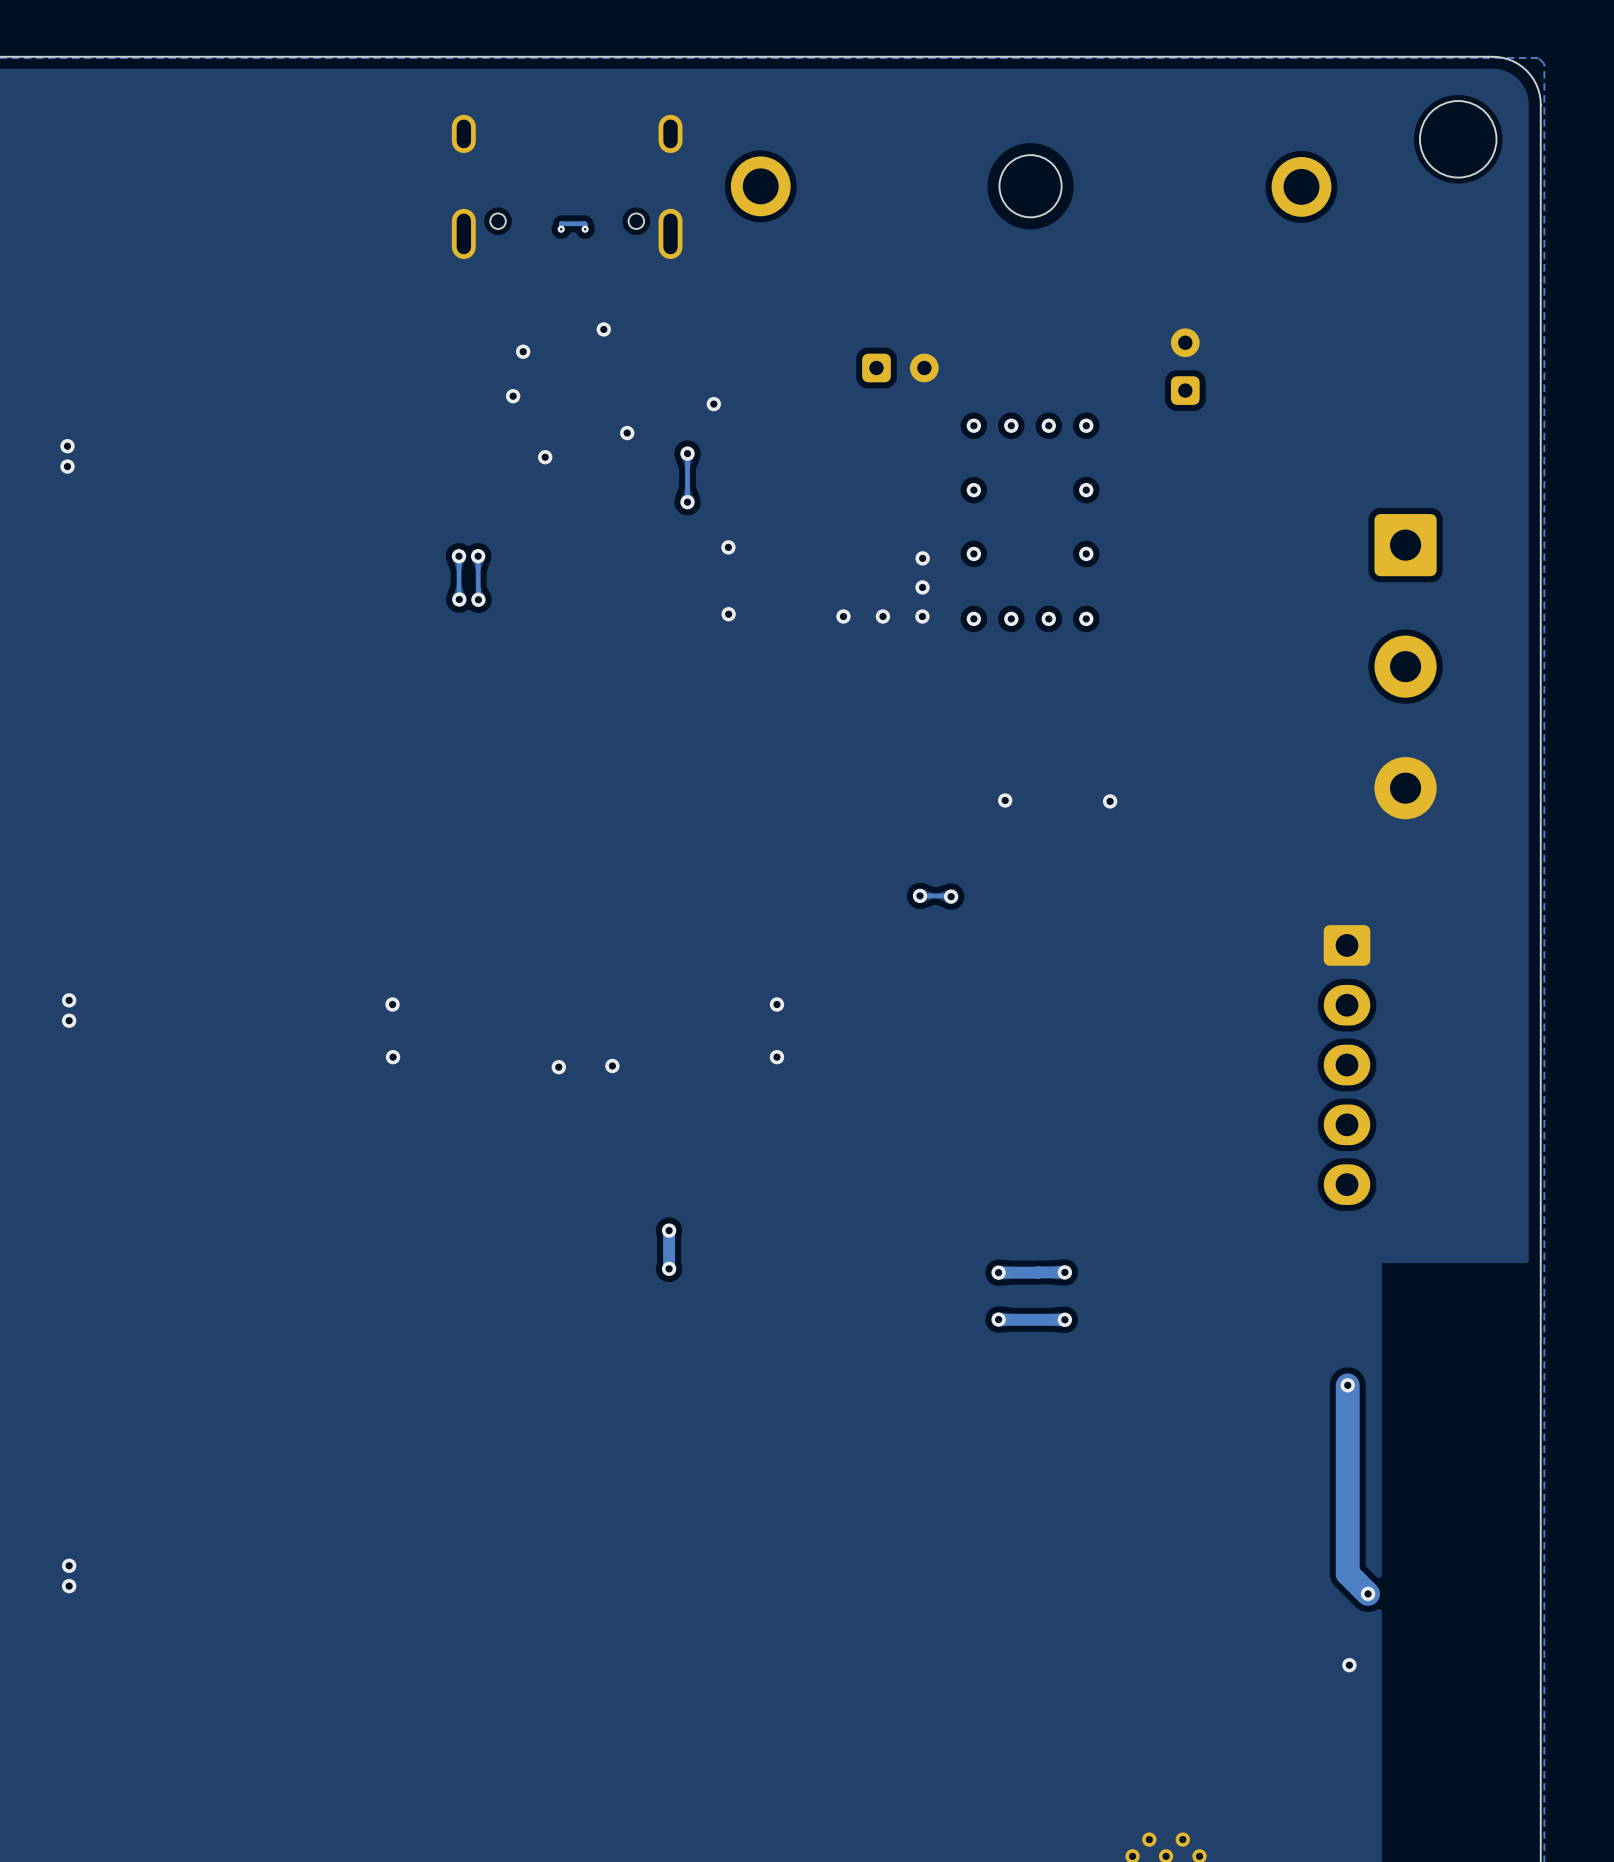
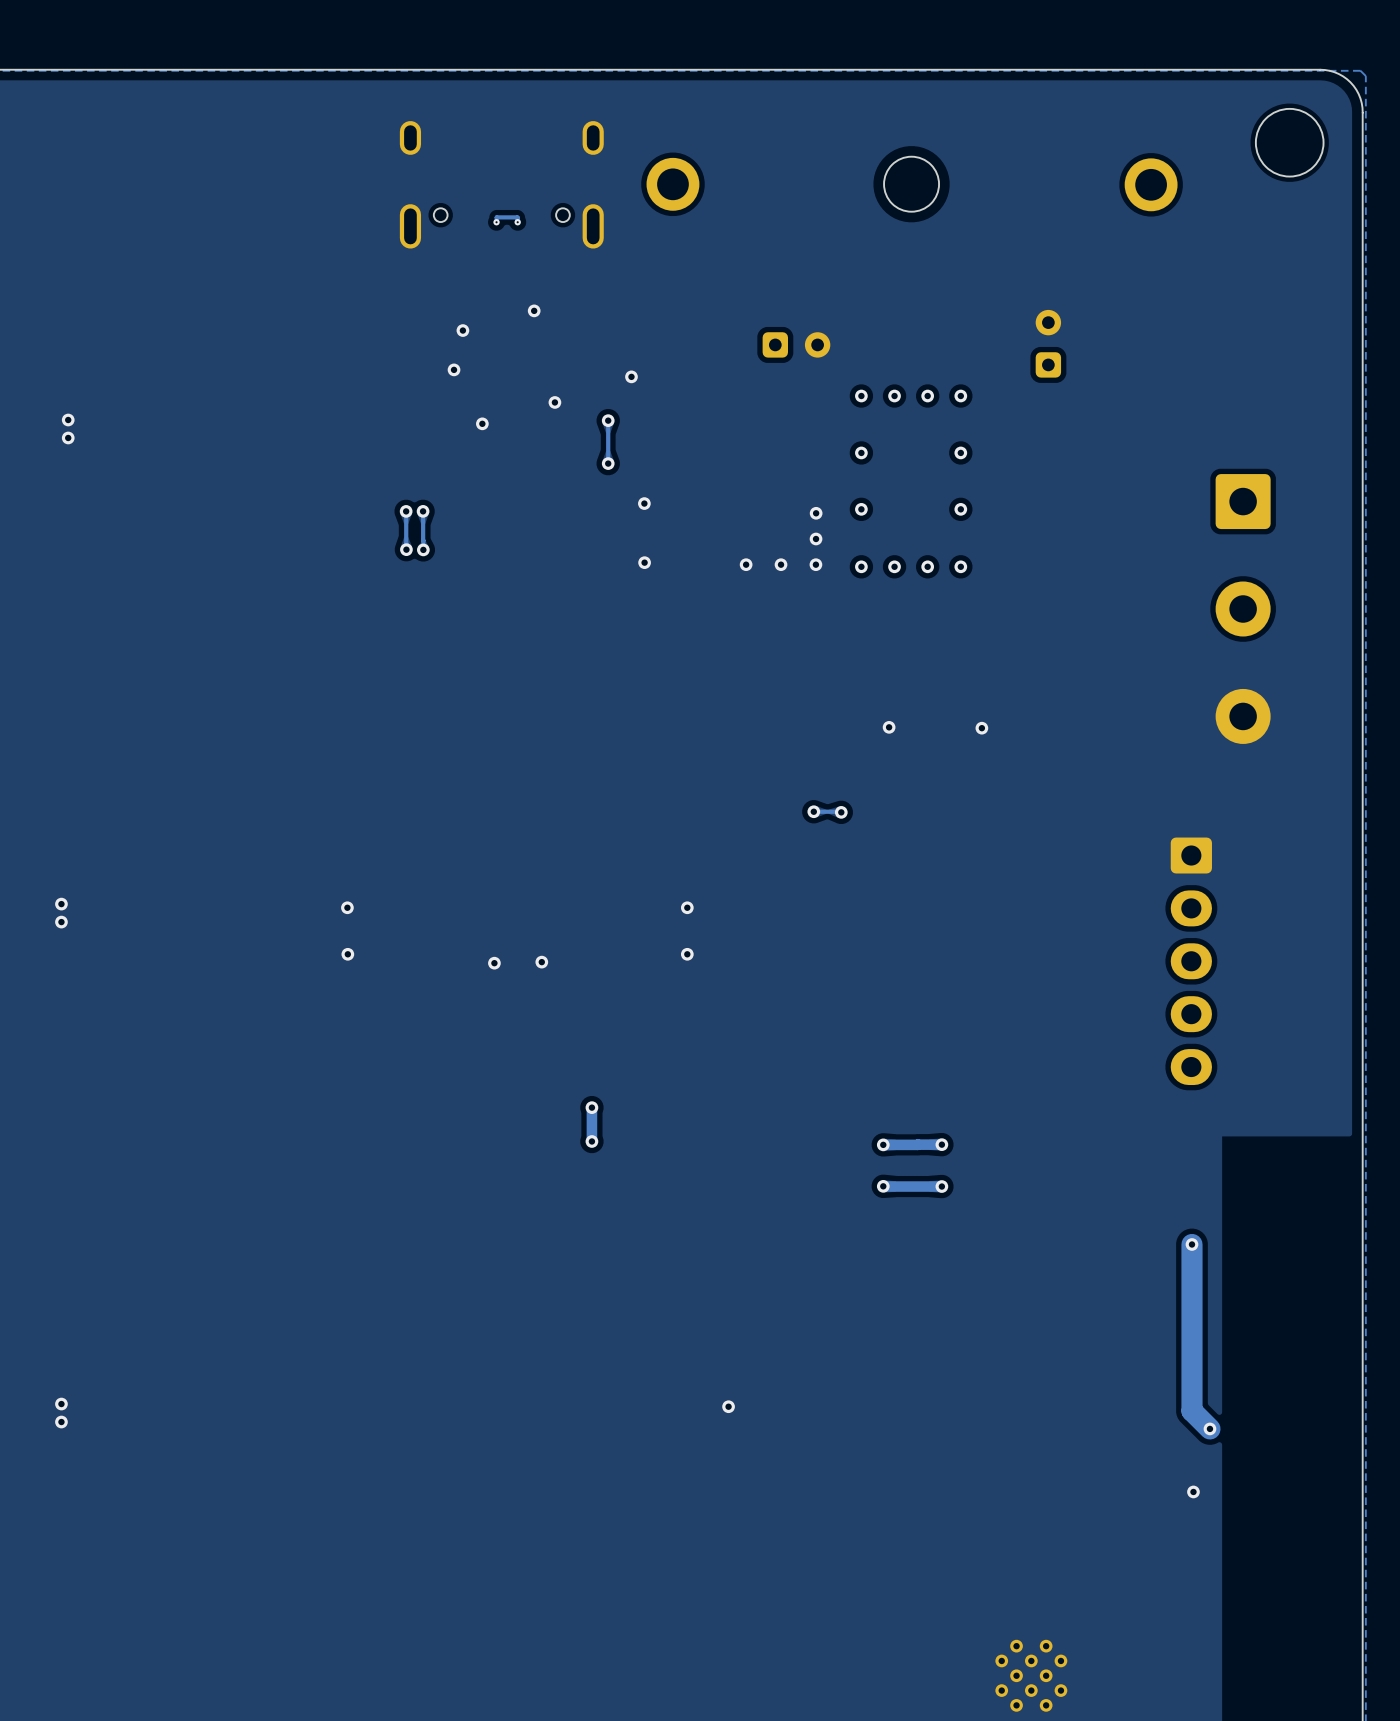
via: (67, 446) -> none
via: none -> (68, 420)
via: (67, 466) -> none
via: none -> (68, 437)
via: none -> (728, 1406)

